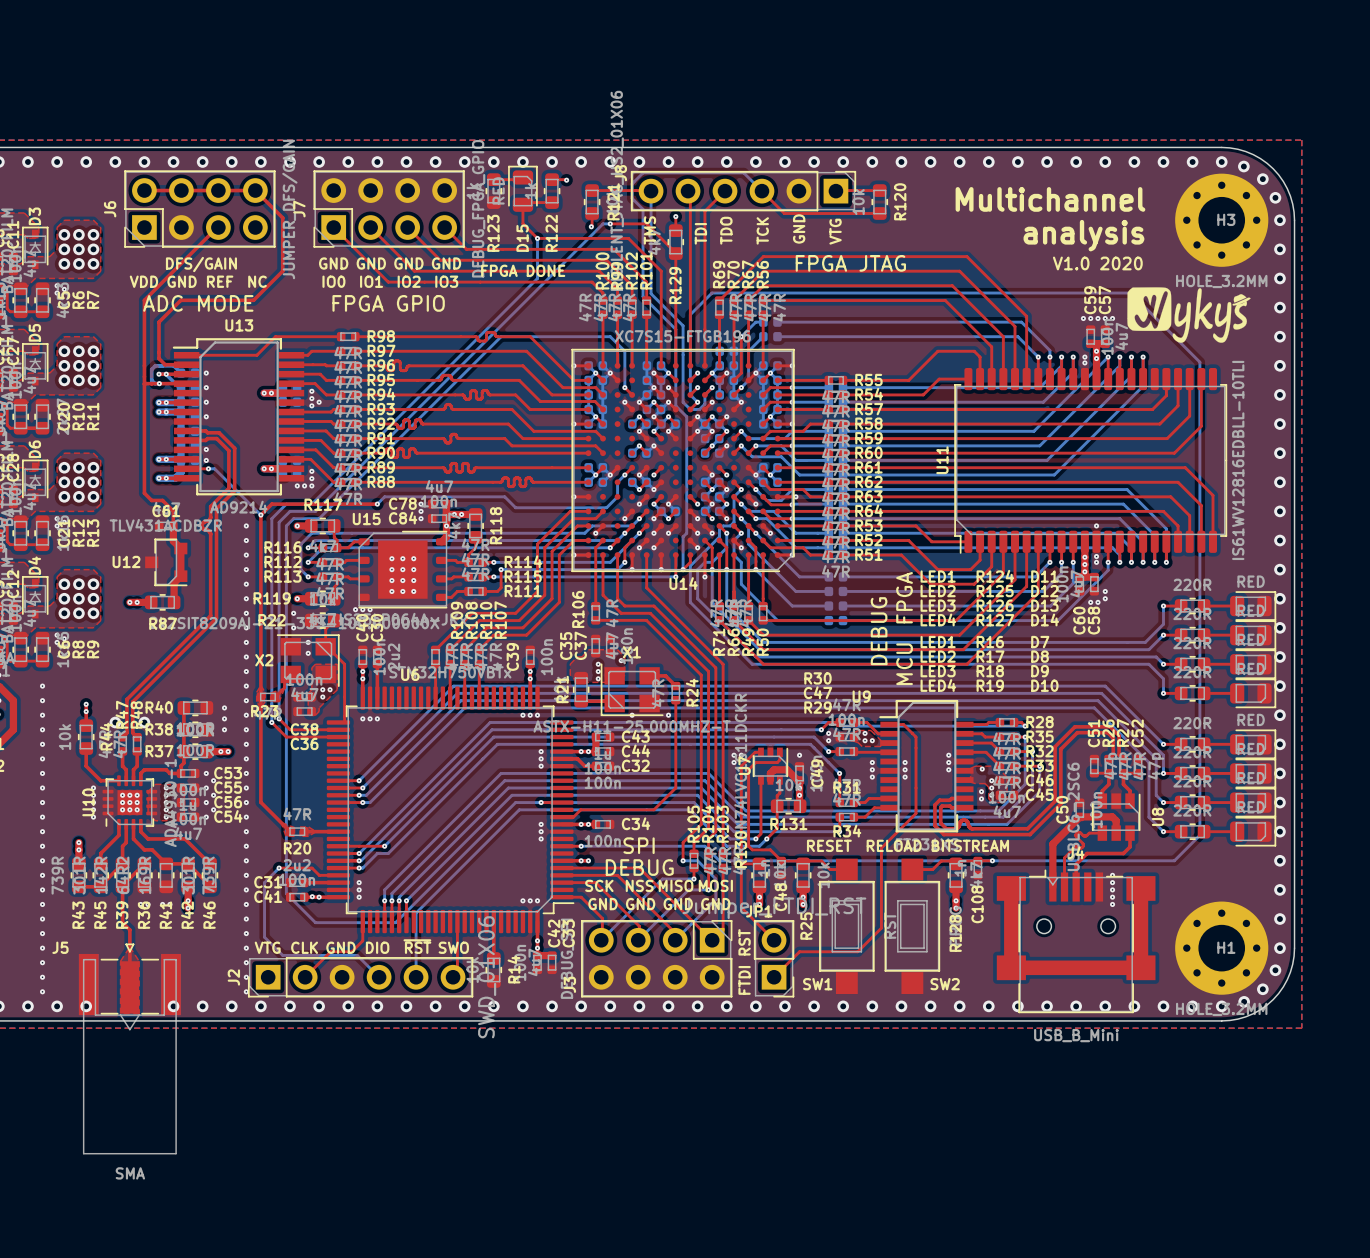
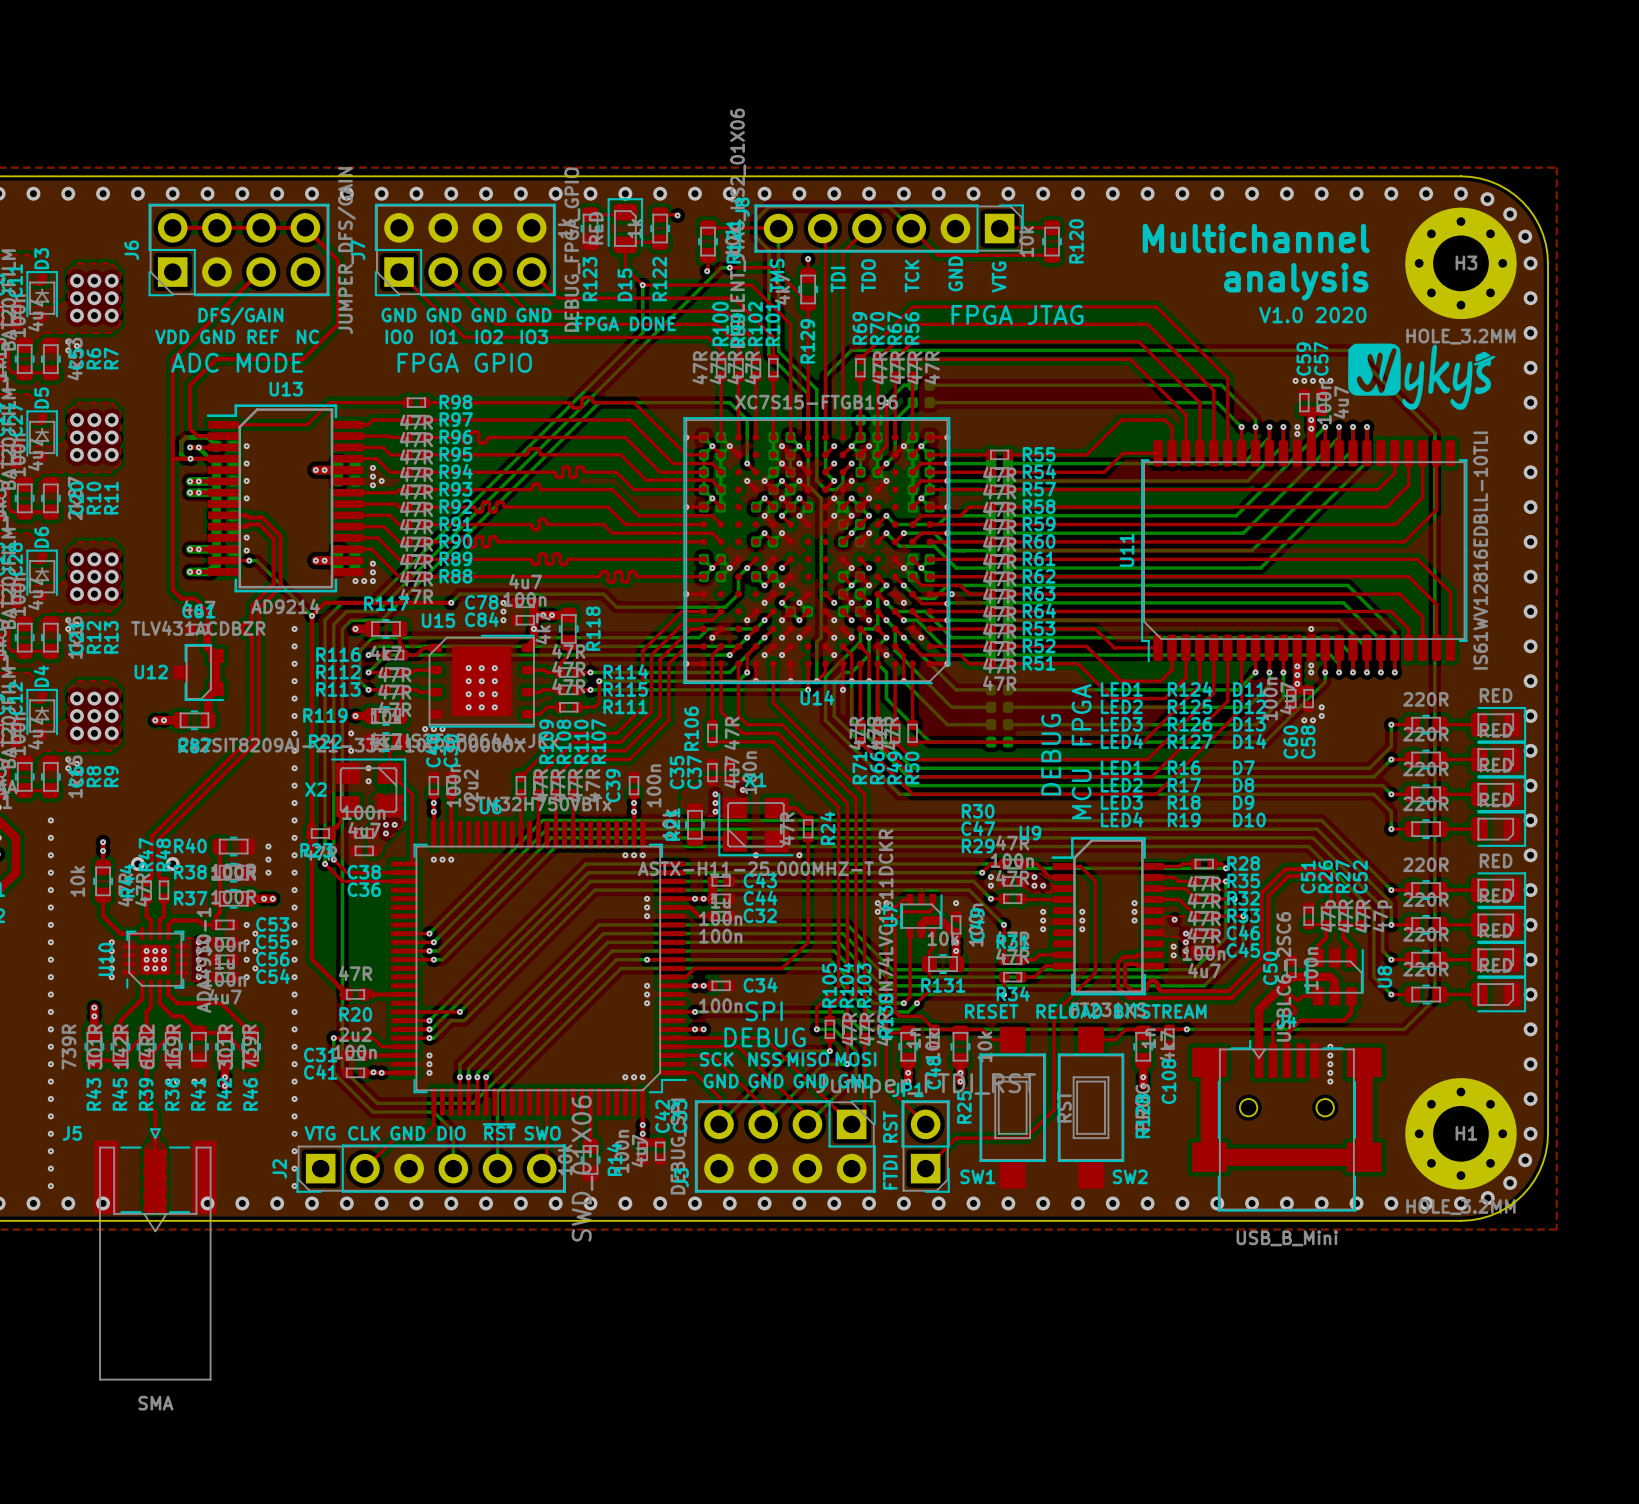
bottom track: (279, 868) (264, 882) (264, 937) (282, 955) (357, 955) (379, 977) -> (333, 1038) (333, 1072) (372, 1112) (433, 1112) (453, 1131) (453, 1168)

